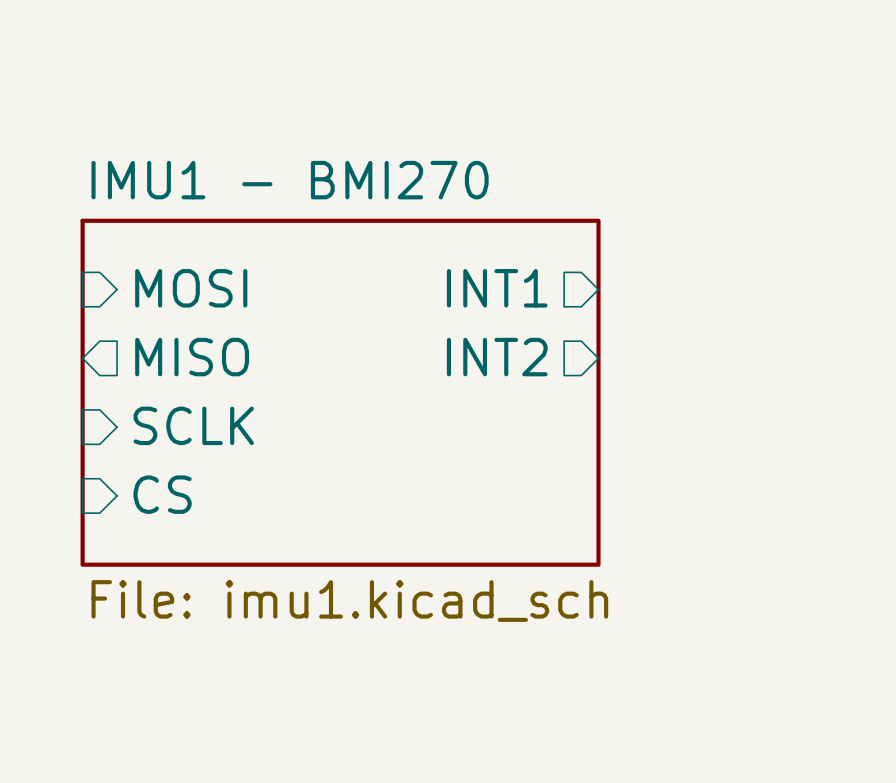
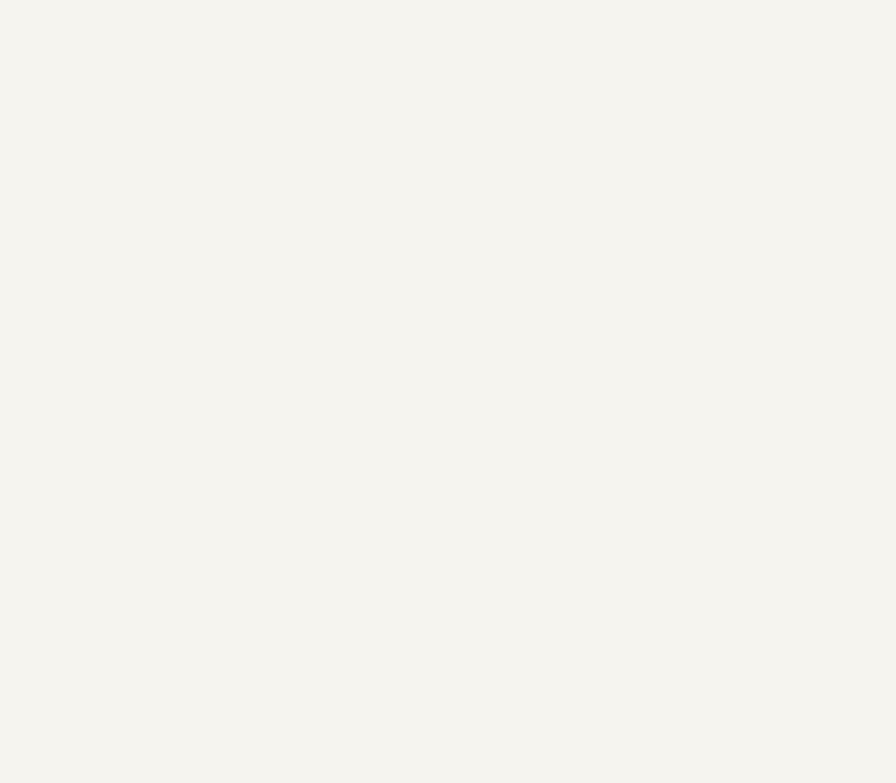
sheet pin: MOSI (191, 288) -> none
sheet pin: INT1 (497, 288) -> none
sheet pin: MISO (192, 357) -> none
sheet pin: INT2 (497, 357) -> none
sheet IMU1 - BMI270: File: imu1.kicad_sch (340, 392) -> none
sheet pin: SCLK (193, 425) -> none
sheet pin: CS (162, 494) -> none

